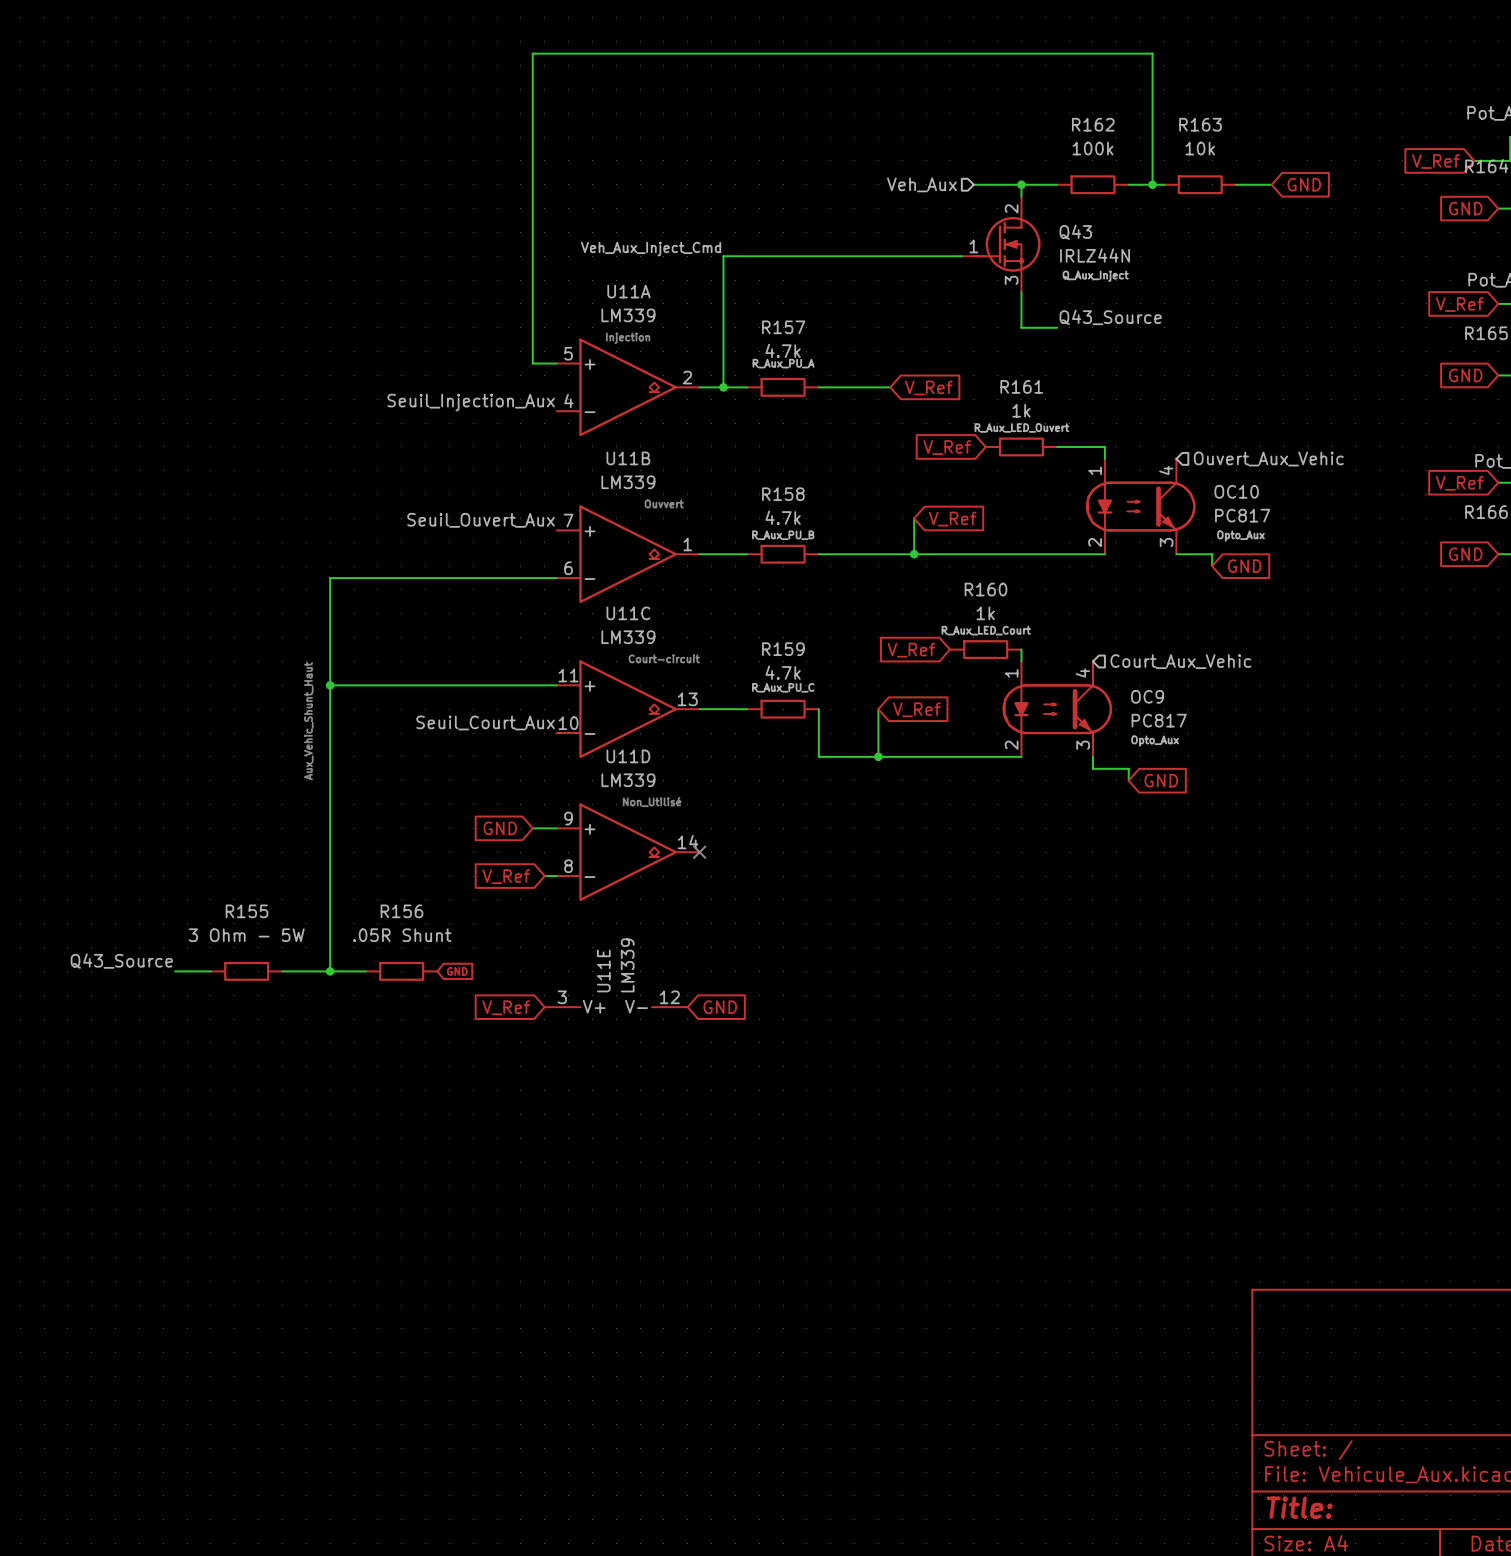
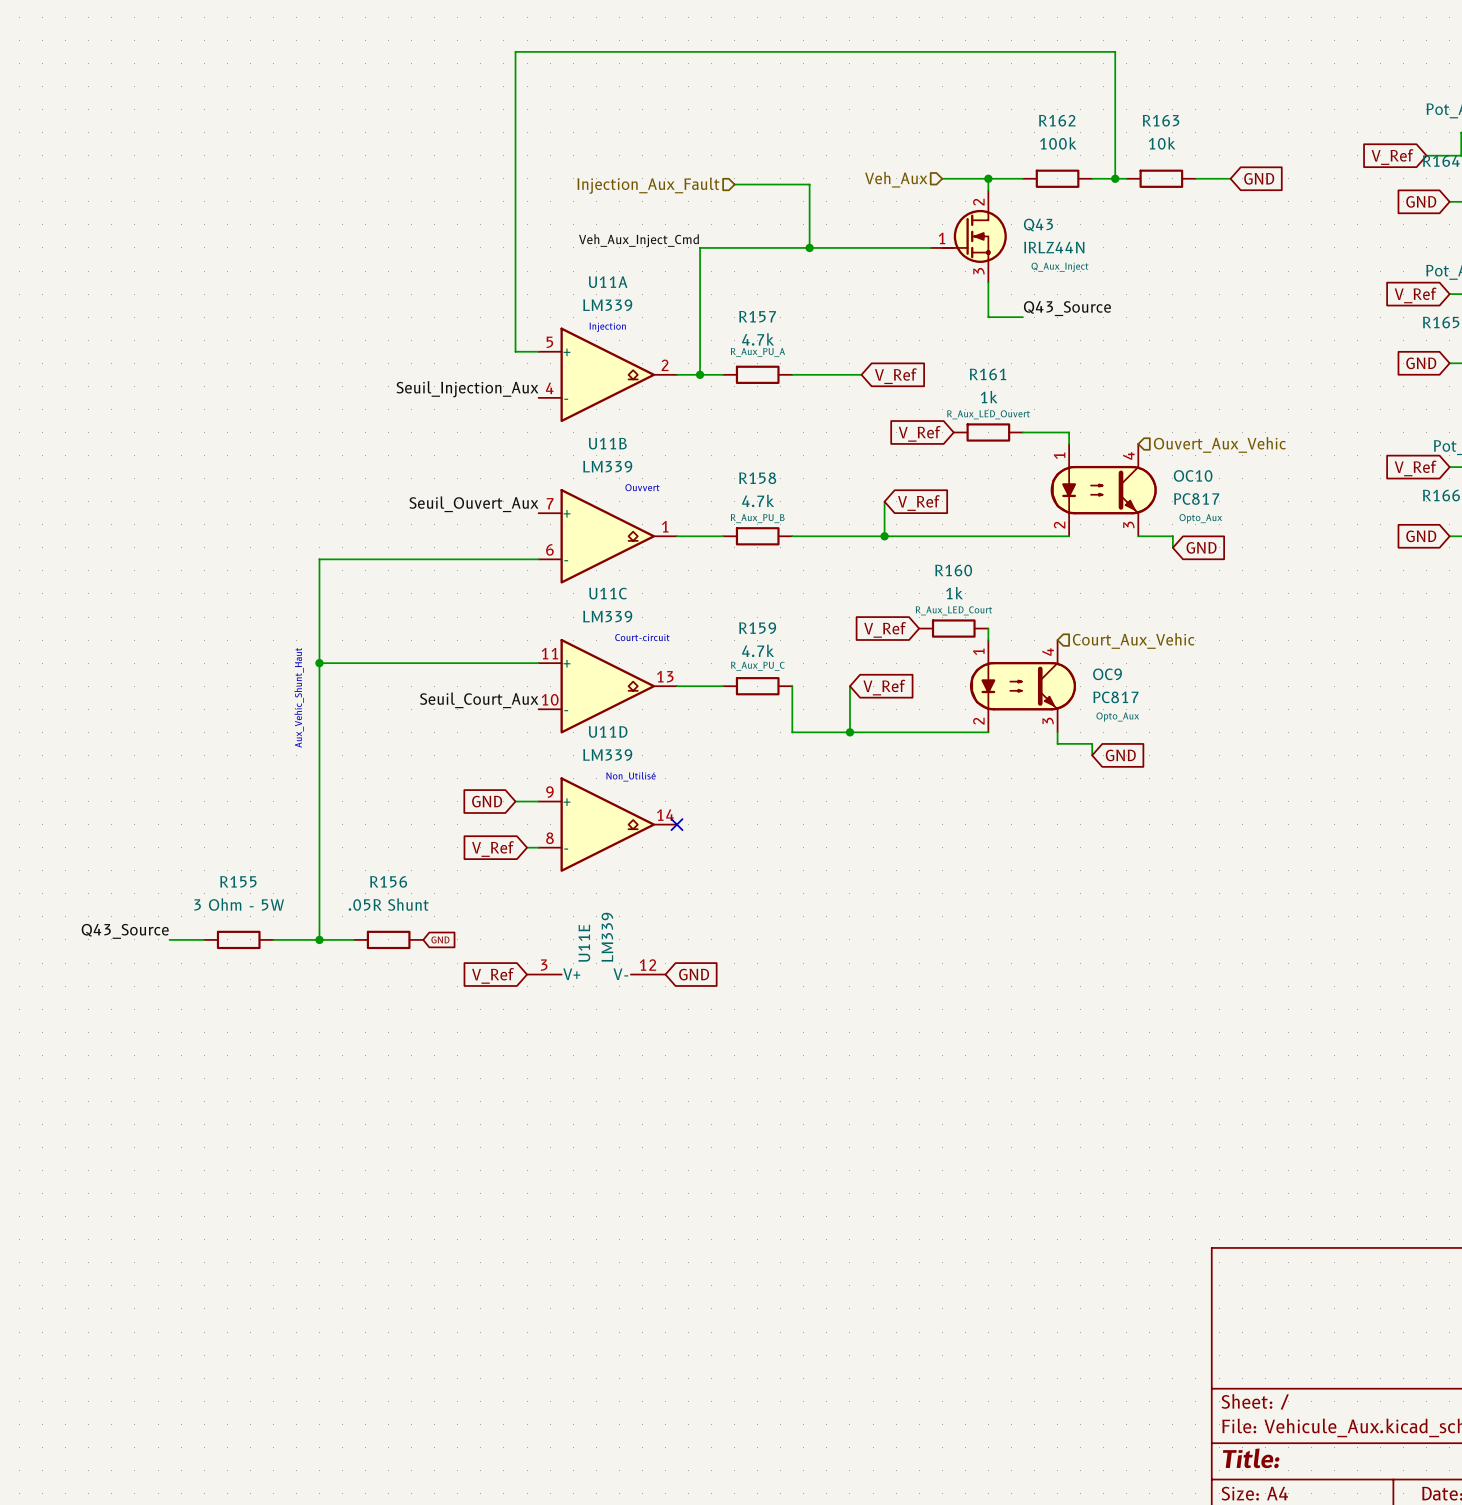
wire: none -> (734, 184) (809, 184) (809, 247)
hierarchical label: none -> Injection_Aux_Fault (648, 185)
junction: none -> (809, 247)

